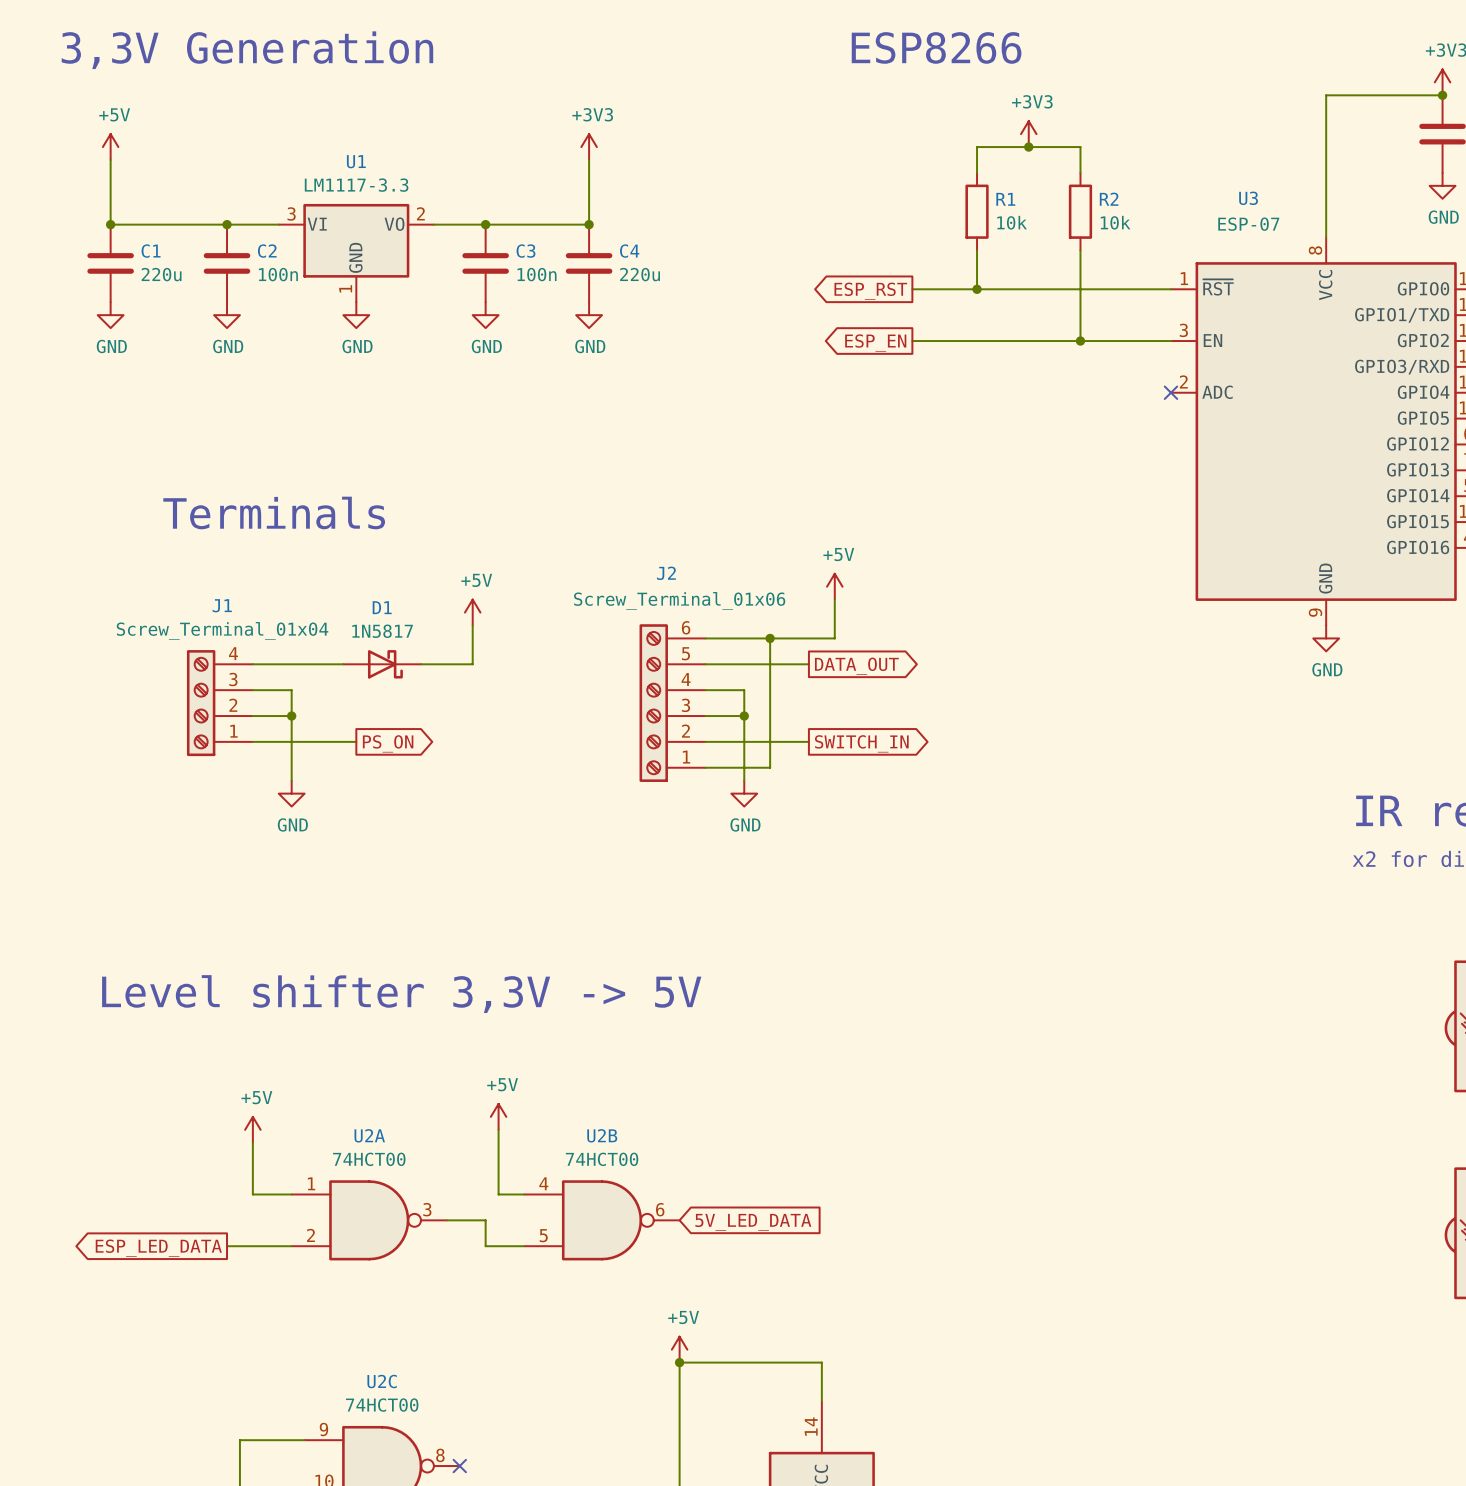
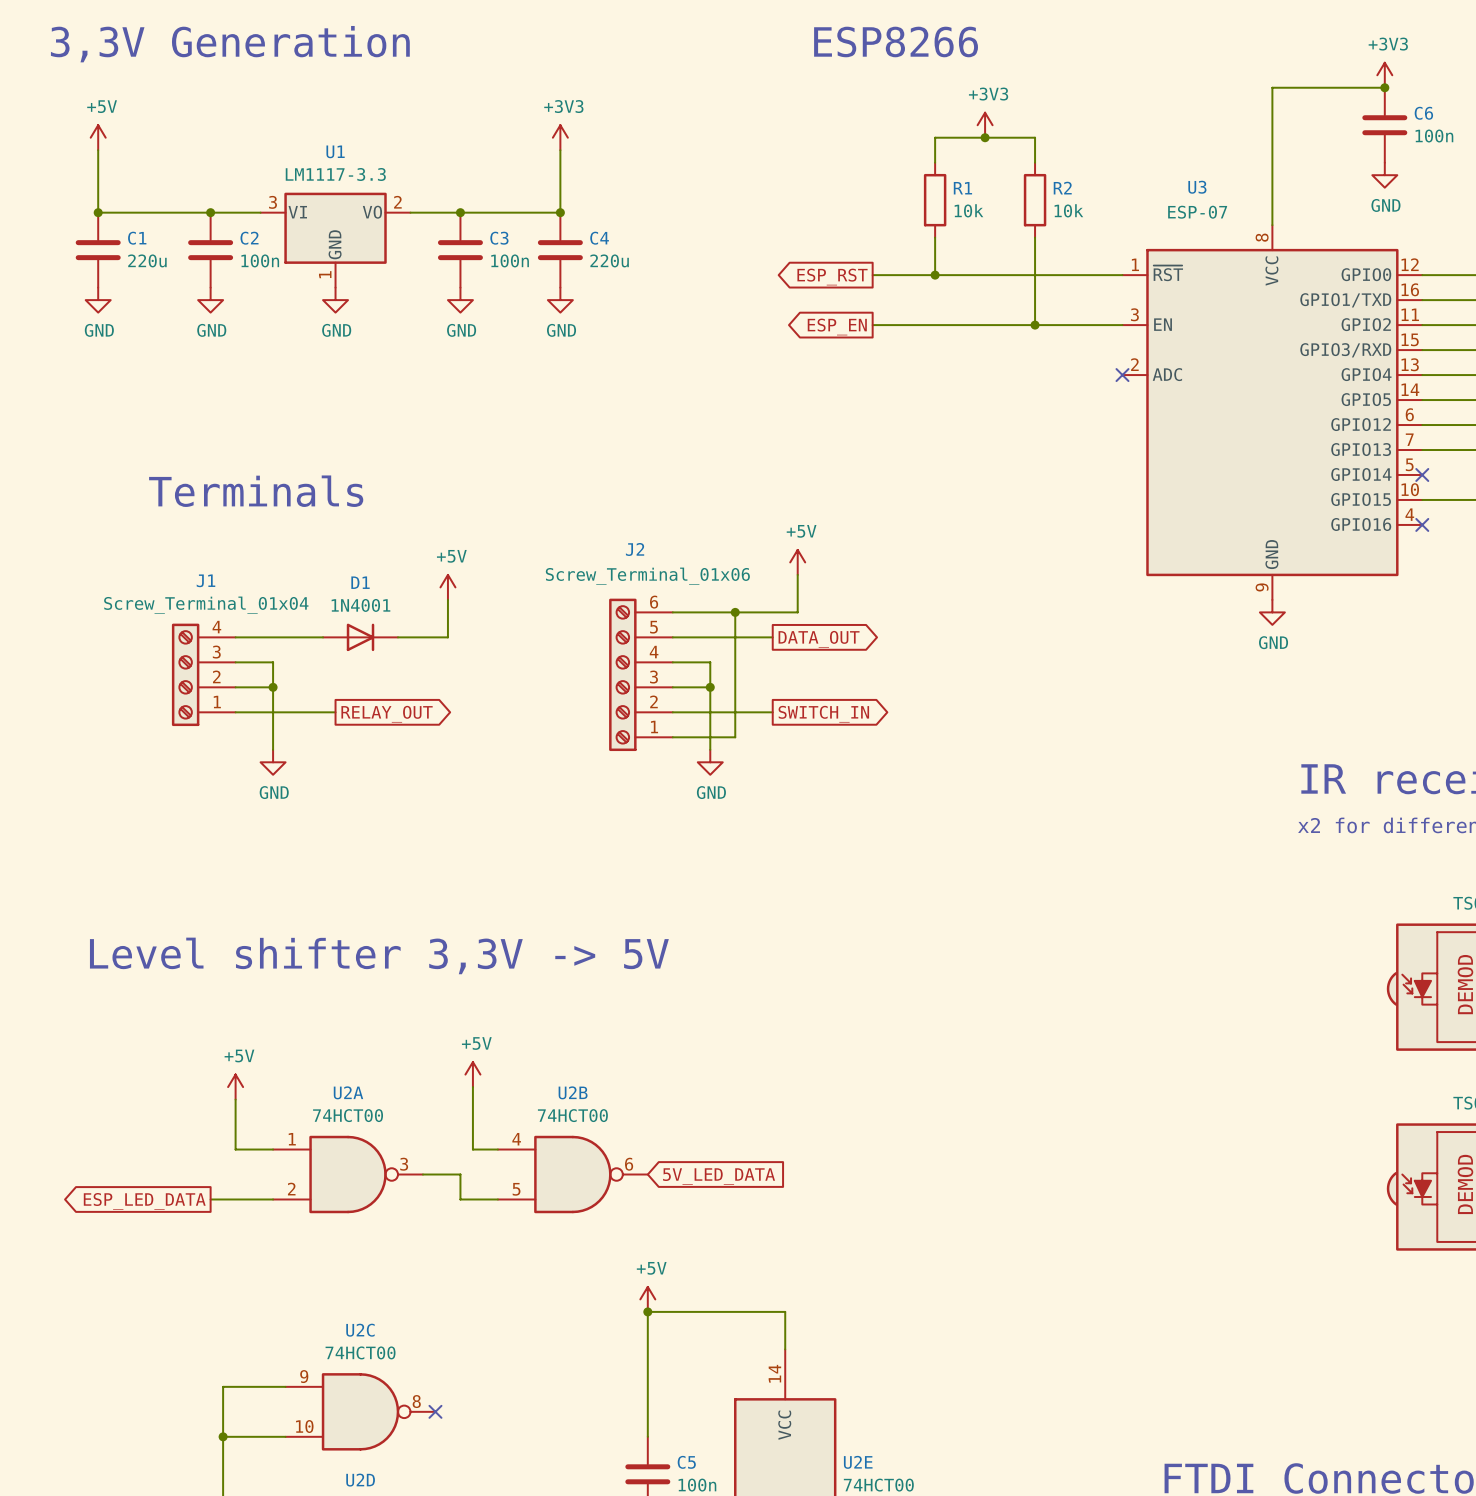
D1 value: 1N5817 (382, 631) -> 1N4001 (360, 605)
D1 symbol: [343, 650, 421, 679] -> [323, 623, 398, 652]
global label: PS_ON (388, 743) -> RELAY_OUT (387, 714)

